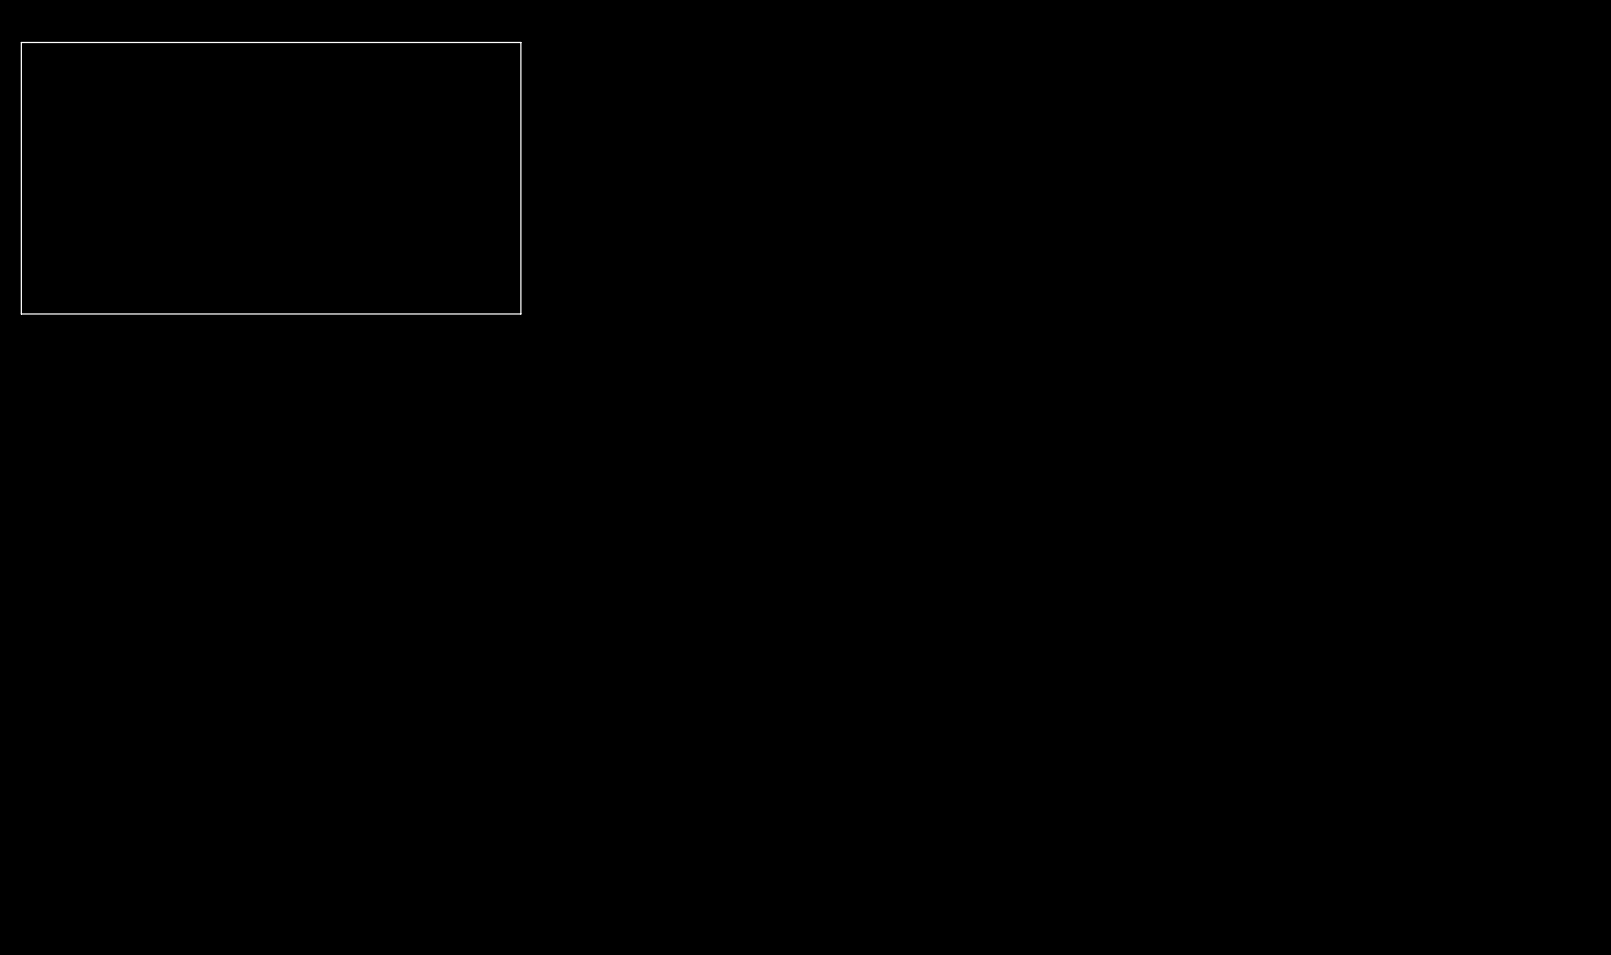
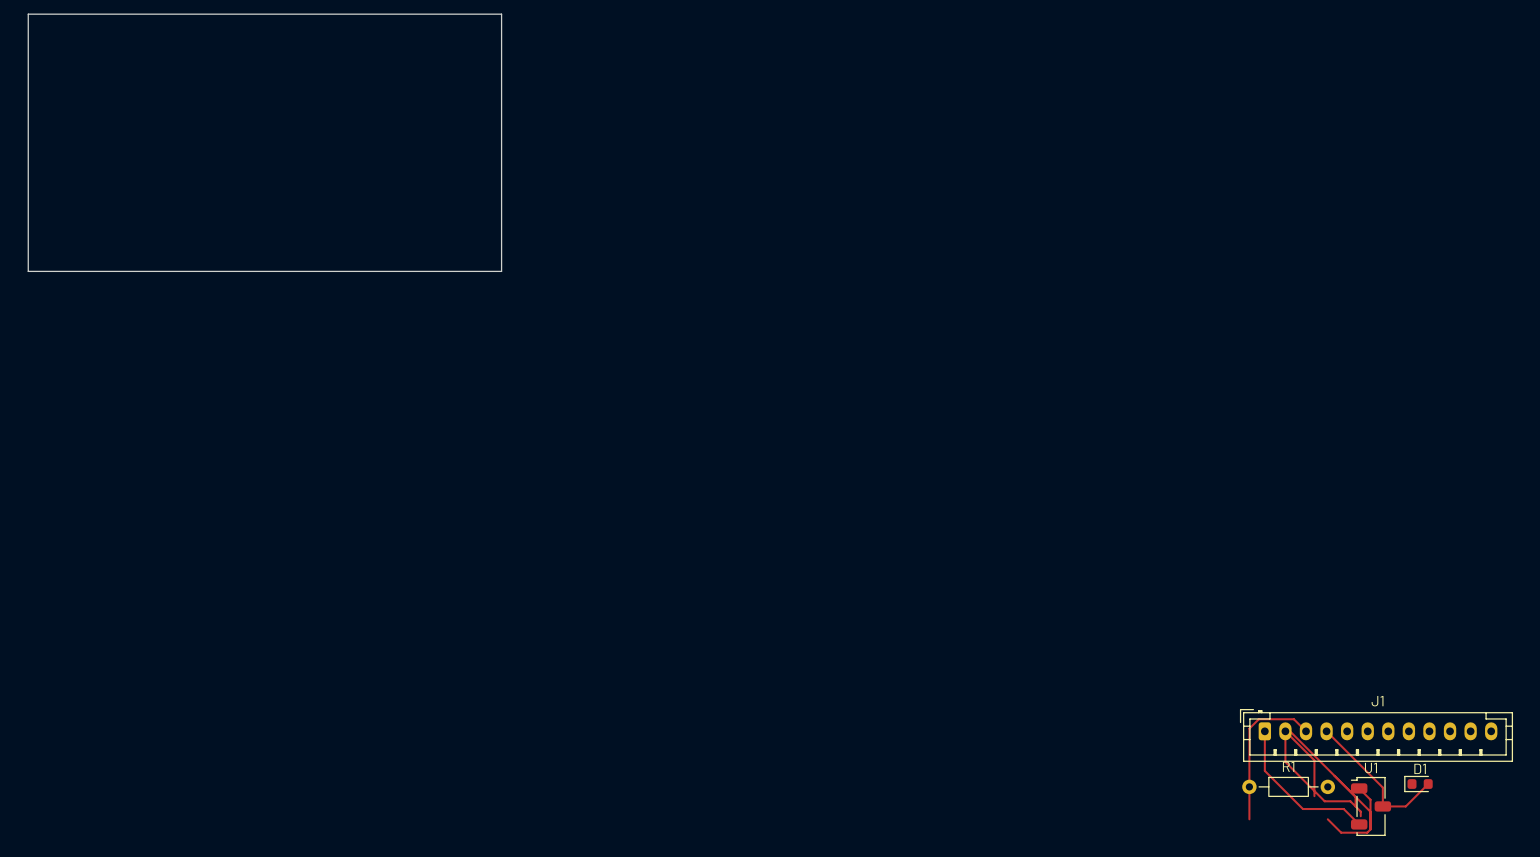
top track: none -> (1264, 731) (1264, 770) (1302, 809) (1343, 809) (1360, 827)
top track: none -> (1285, 731) (1290, 731) (1370, 811)
top track: none -> (1285, 731) (1314, 760) (1314, 796)
top track: none -> (1285, 731) (1285, 761) (1324, 801) (1350, 801) (1360, 811) (1360, 816)
top track: none -> (1305, 731) (1293, 719) (1258, 719) (1249, 728) (1249, 819)
top track: none -> (1326, 731) (1382, 787) (1382, 806)
J1: none -> (1376, 735)
D1: none -> (1418, 784)
top track: none -> (1428, 784) (1405, 806) (1381, 806)
R1: none -> (1288, 786)
top track: none -> (1359, 788) (1370, 799) (1370, 829) (1367, 832) (1341, 832) (1327, 819)
top track: none -> (1355, 796) (1355, 806)
U1: none -> (1370, 806)

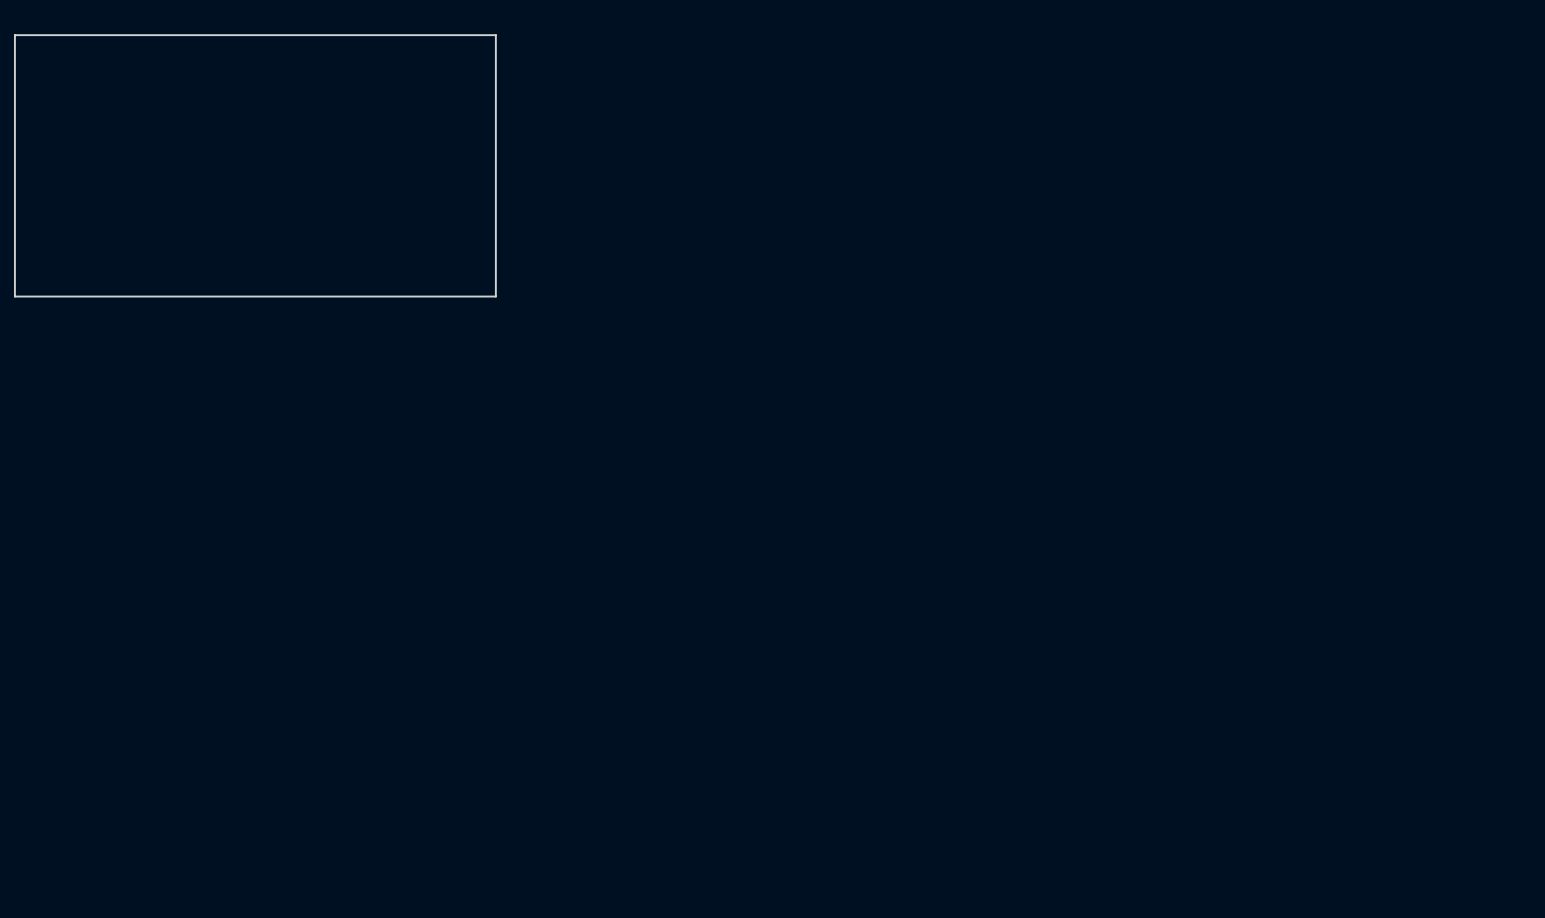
top track: (1264, 731) (1264, 770) (1302, 809) (1343, 809) (1360, 827) -> none
top track: (1285, 731) (1290, 731) (1370, 811) -> none
top track: (1285, 731) (1314, 760) (1314, 796) -> none
top track: (1285, 731) (1285, 761) (1324, 801) (1350, 801) (1360, 811) (1360, 816) -> none
top track: (1305, 731) (1293, 719) (1258, 719) (1249, 728) (1249, 819) -> none
top track: (1326, 731) (1382, 787) (1382, 806) -> none
J1: (1376, 735) -> none
D1: (1418, 784) -> none
top track: (1428, 784) (1405, 806) (1381, 806) -> none
R1: (1288, 786) -> none
top track: (1359, 788) (1370, 799) (1370, 829) (1367, 832) (1341, 832) (1327, 819) -> none
top track: (1355, 796) (1355, 806) -> none
U1: (1370, 806) -> none

